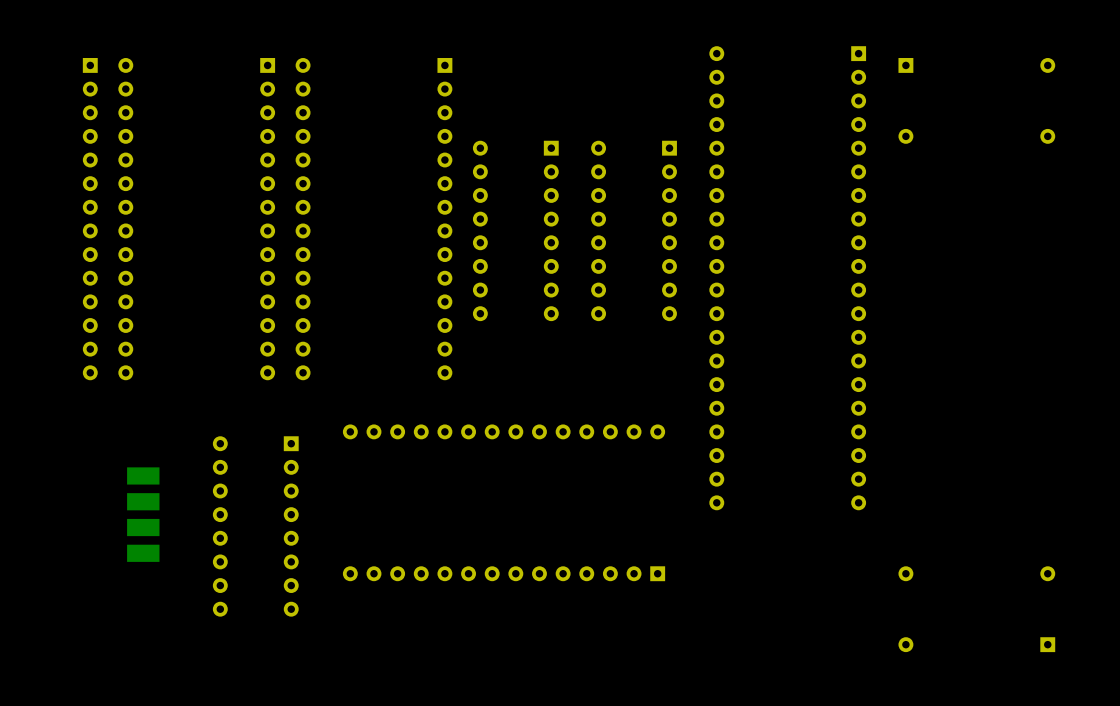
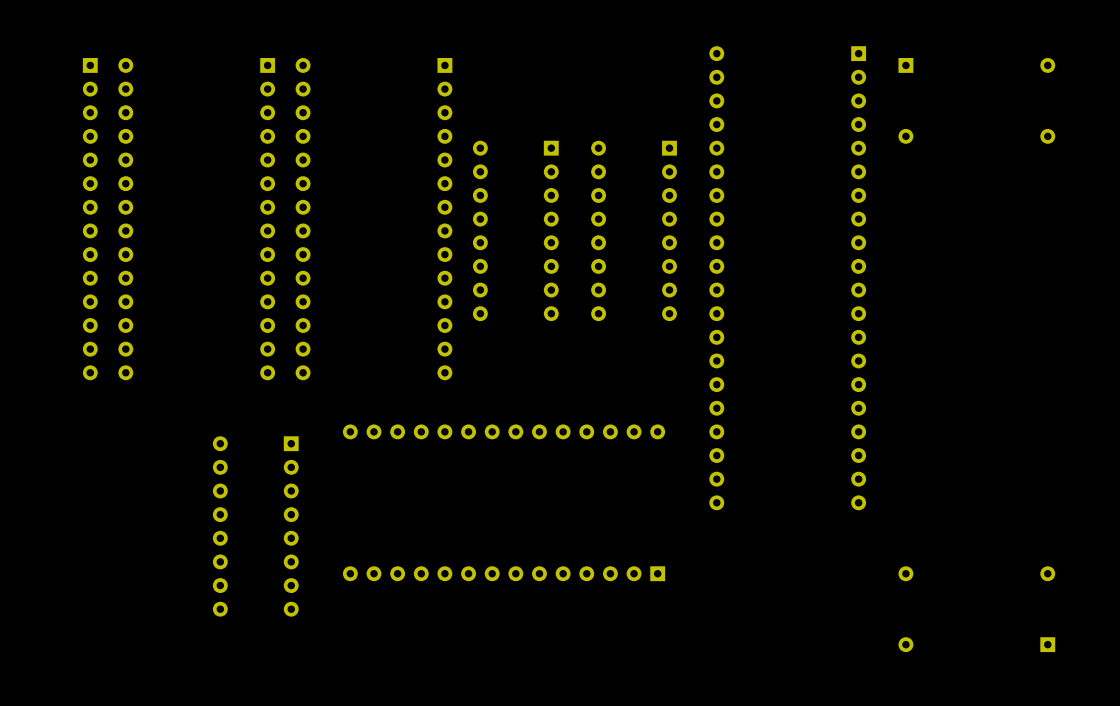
part: (143, 514) -> none

